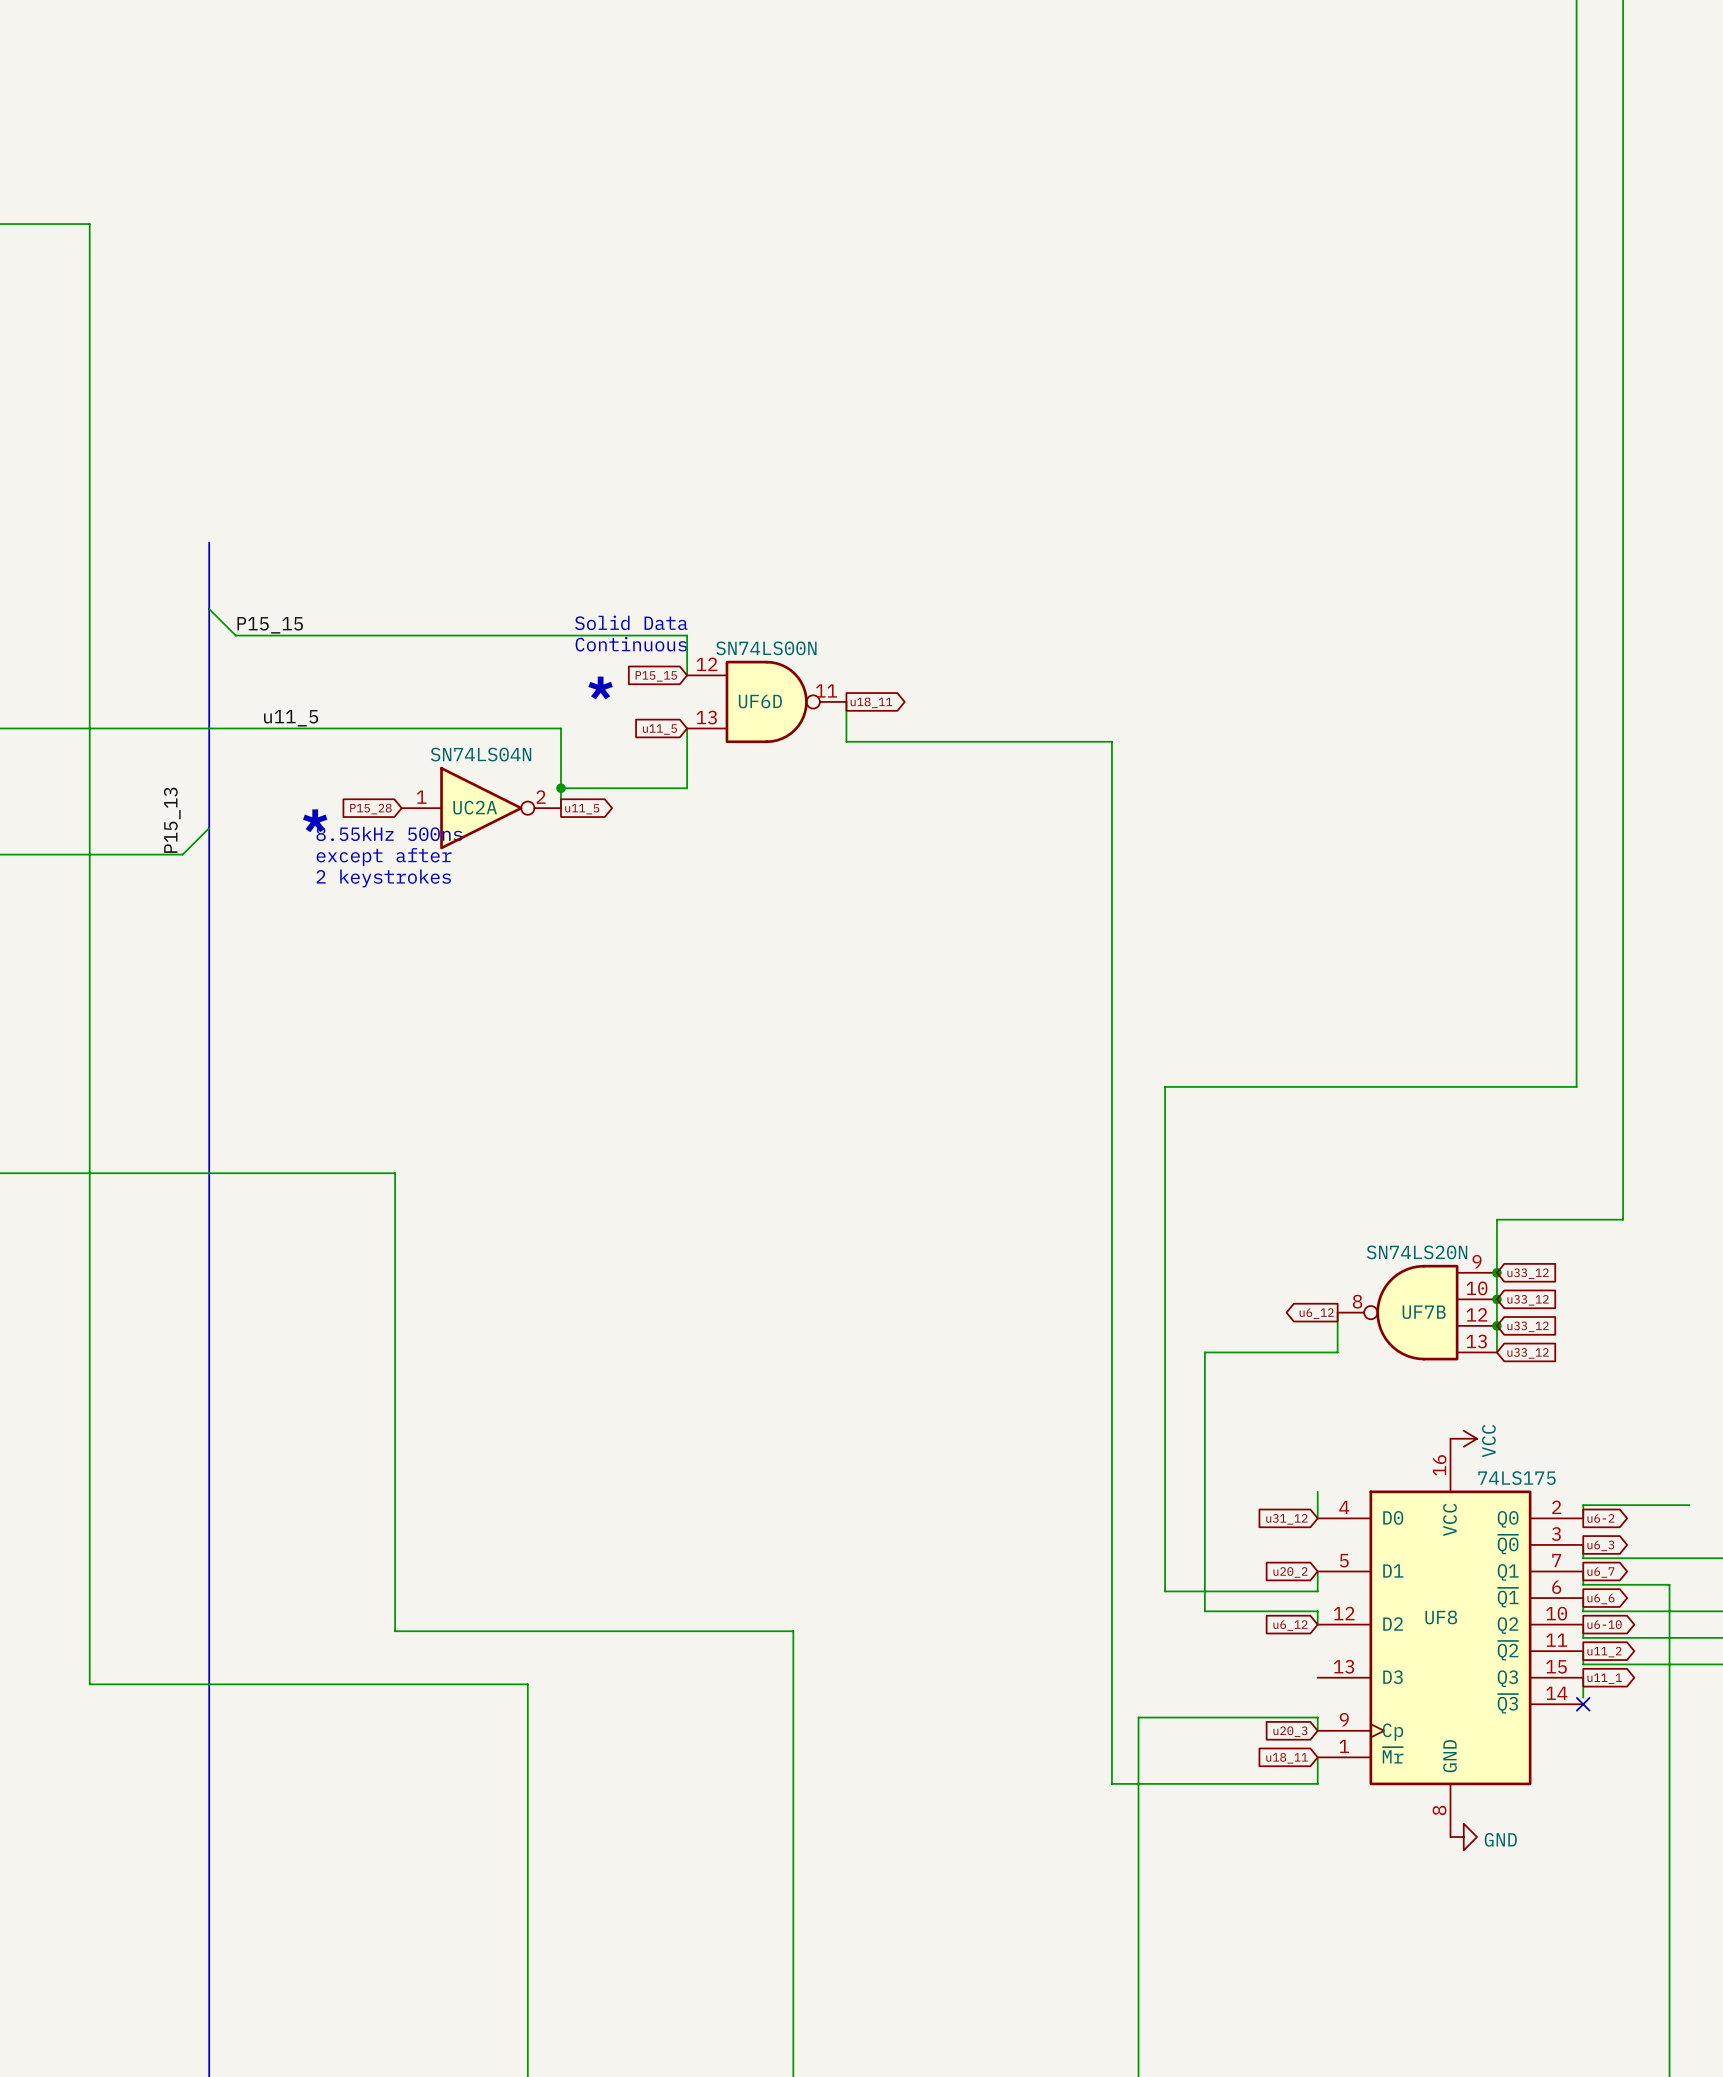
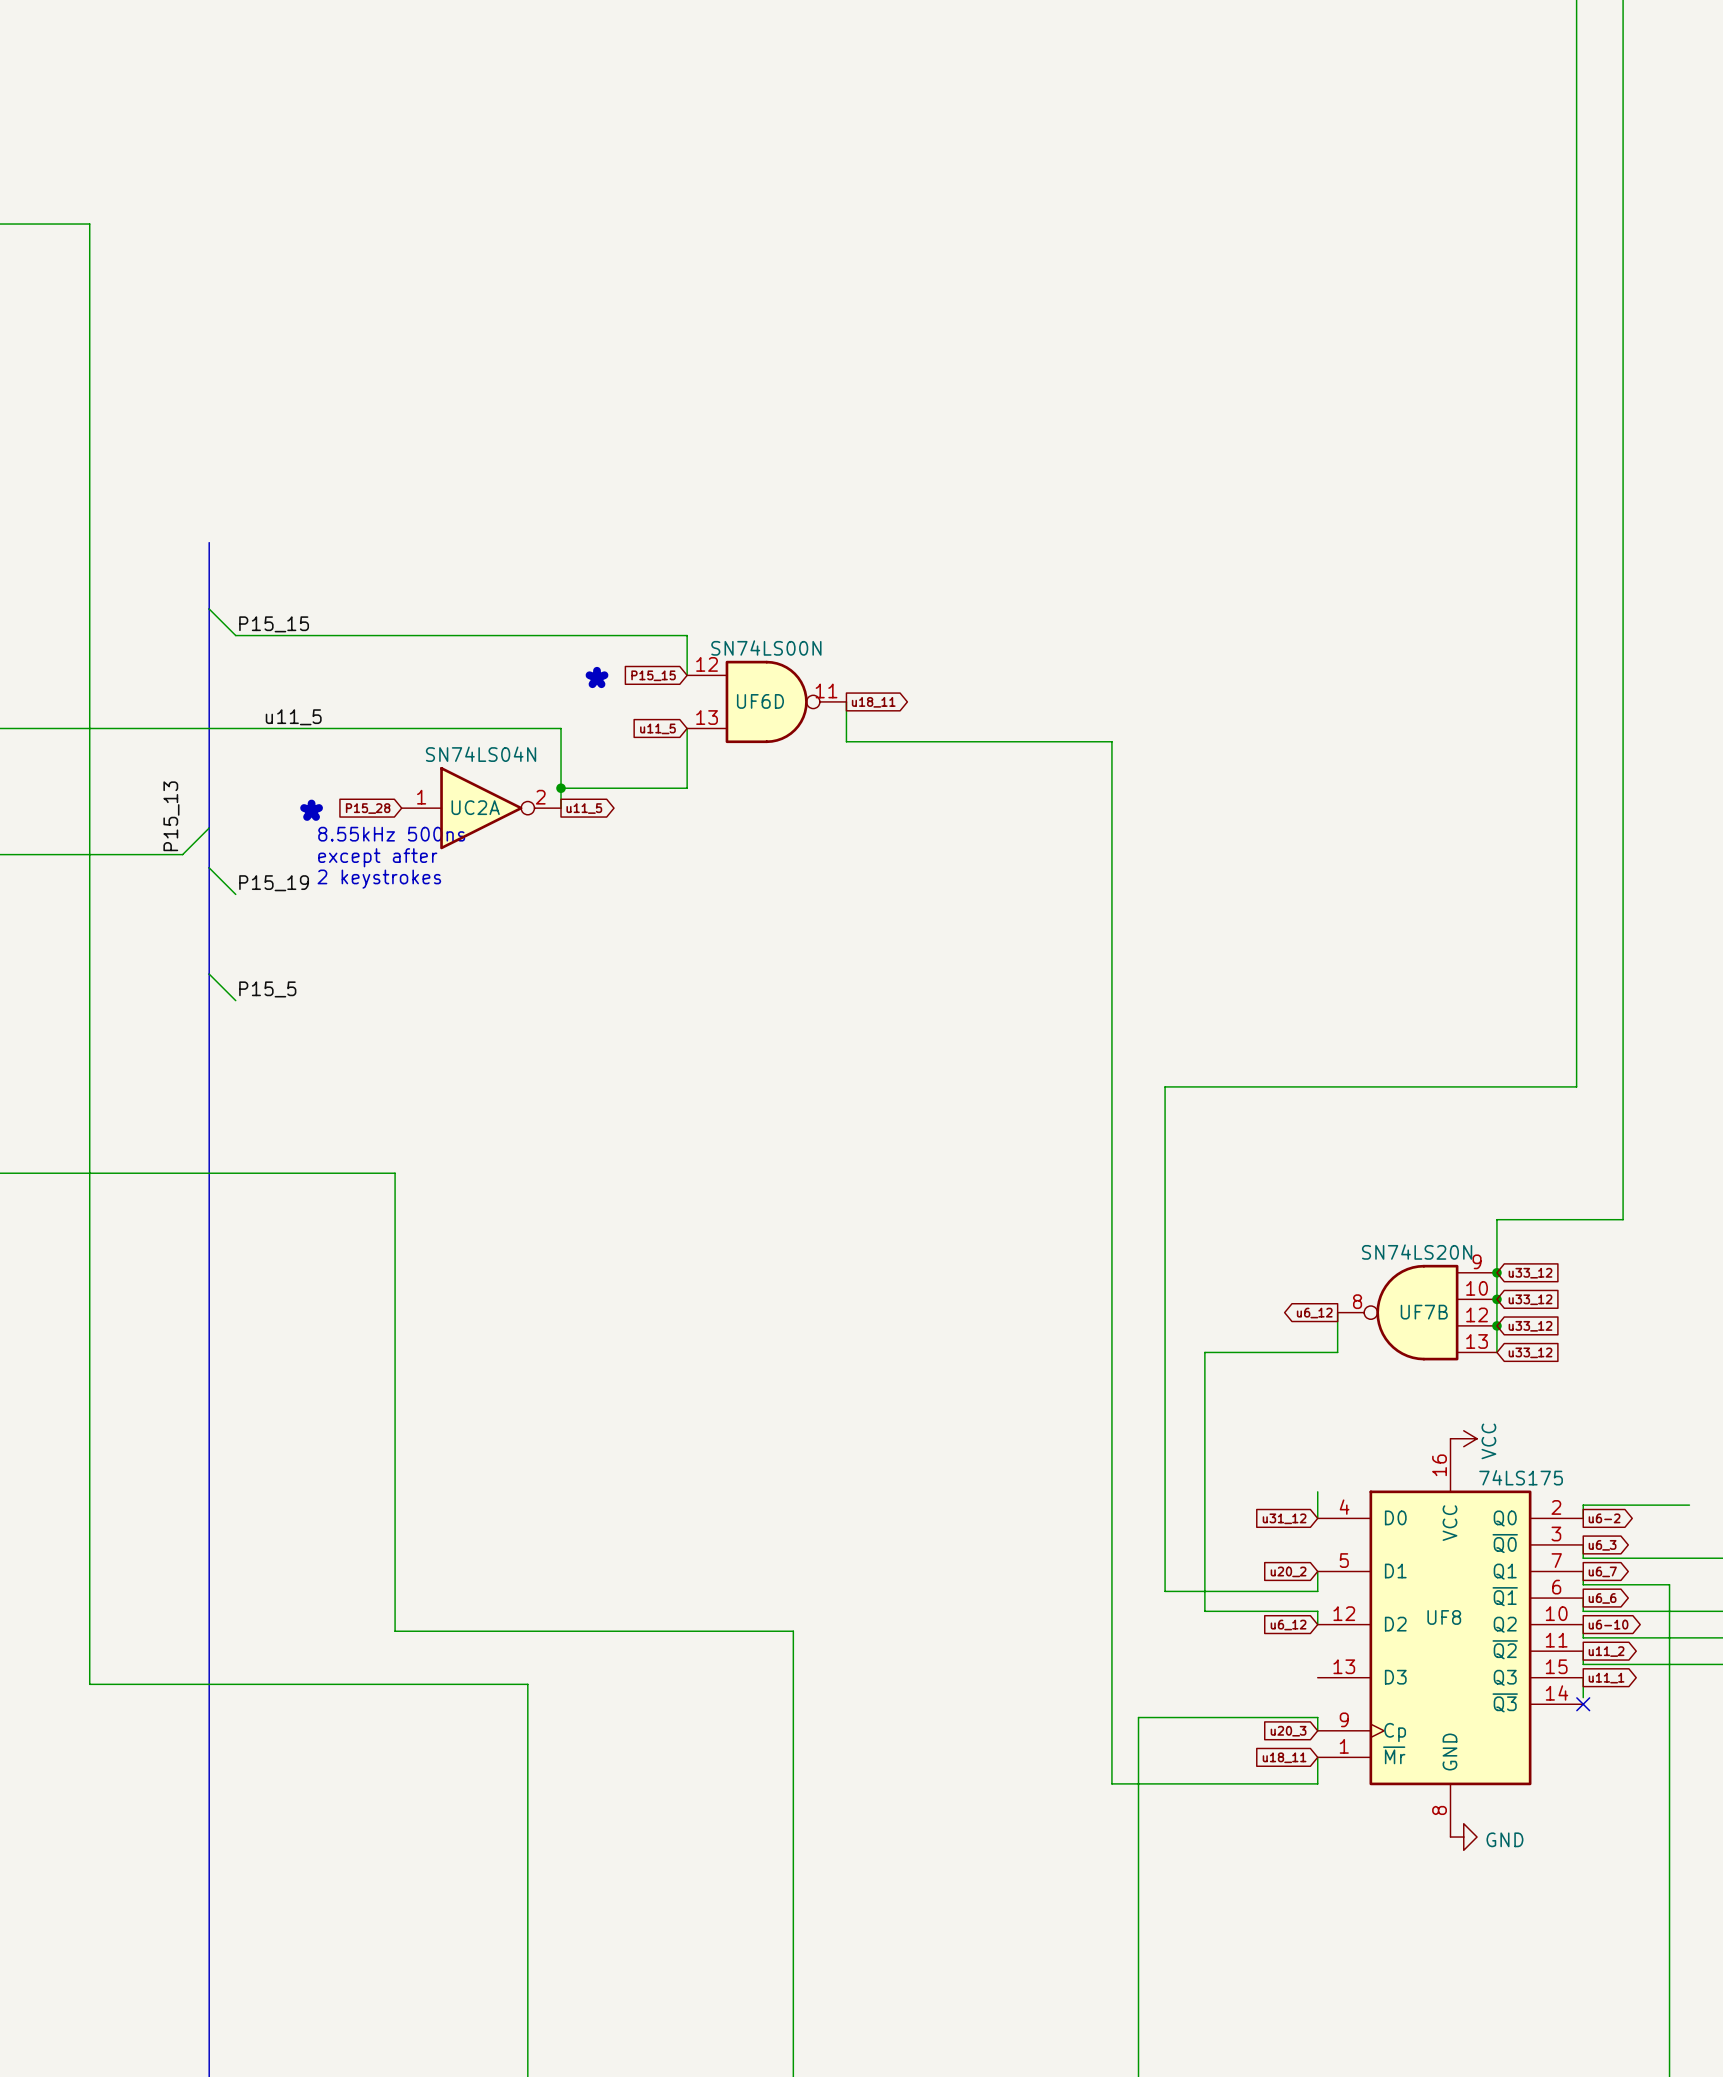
text: Solid Data (631, 622) -> none
text: Continuous (631, 644) -> none
wire: none -> (209, 867) (235, 894)
label: none -> P15_19 (274, 883)
wire: none -> (209, 974) (235, 1000)
label: none -> P15_5 (267, 989)

